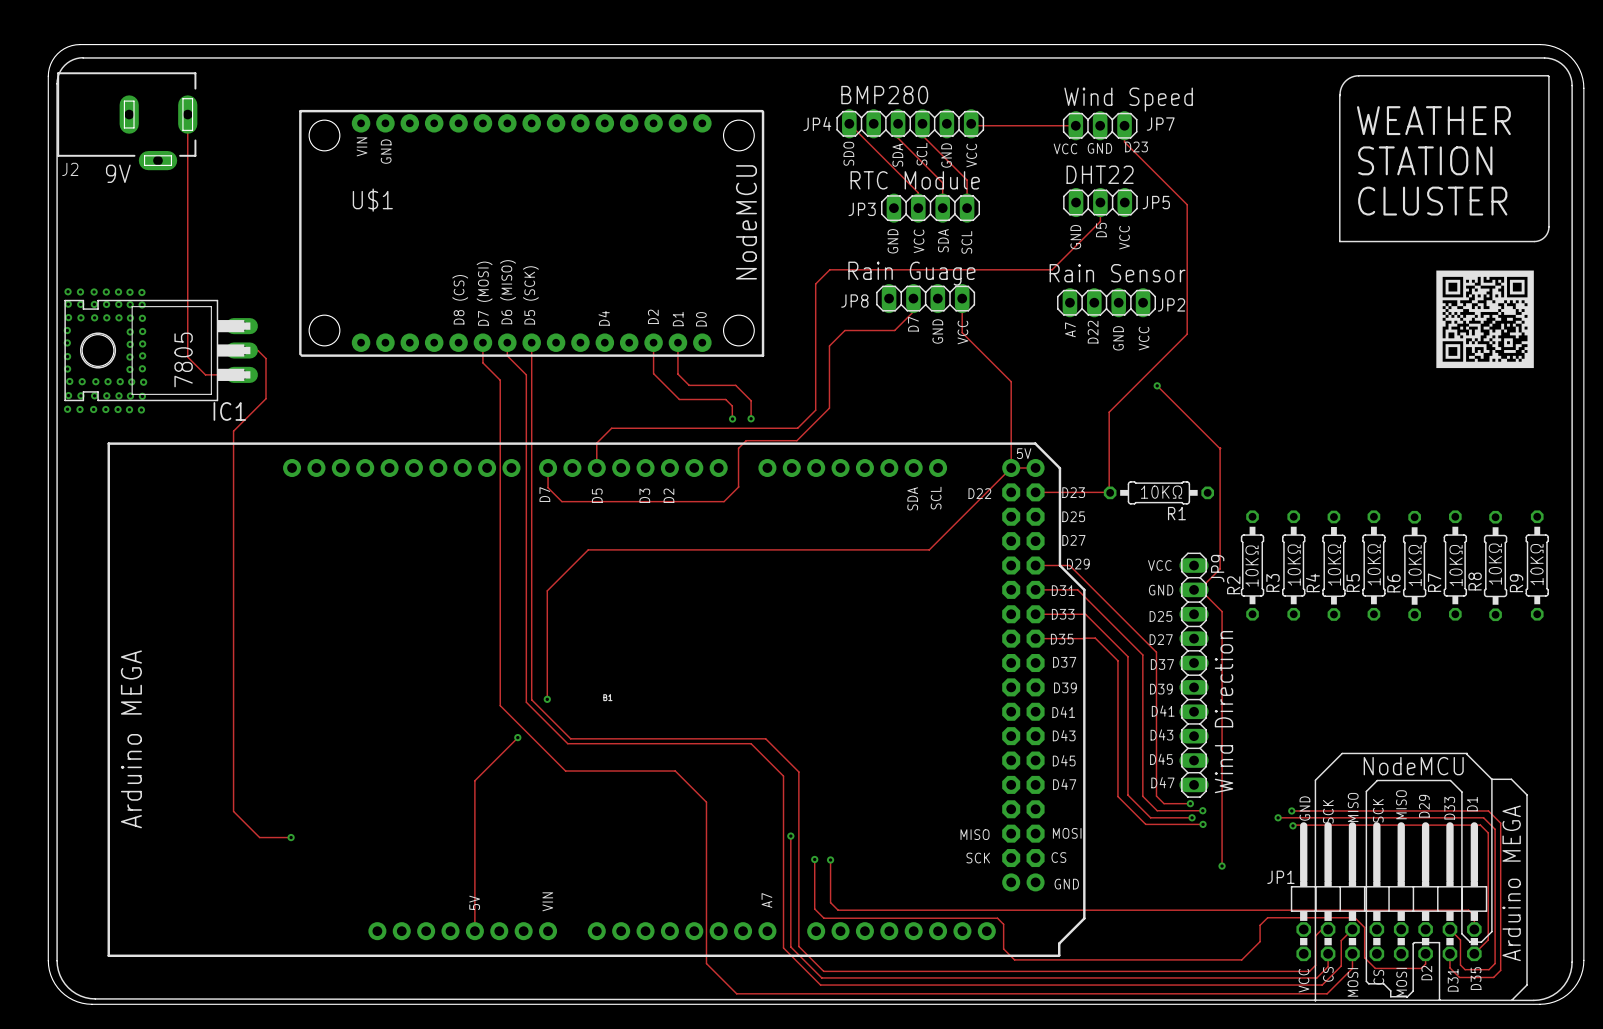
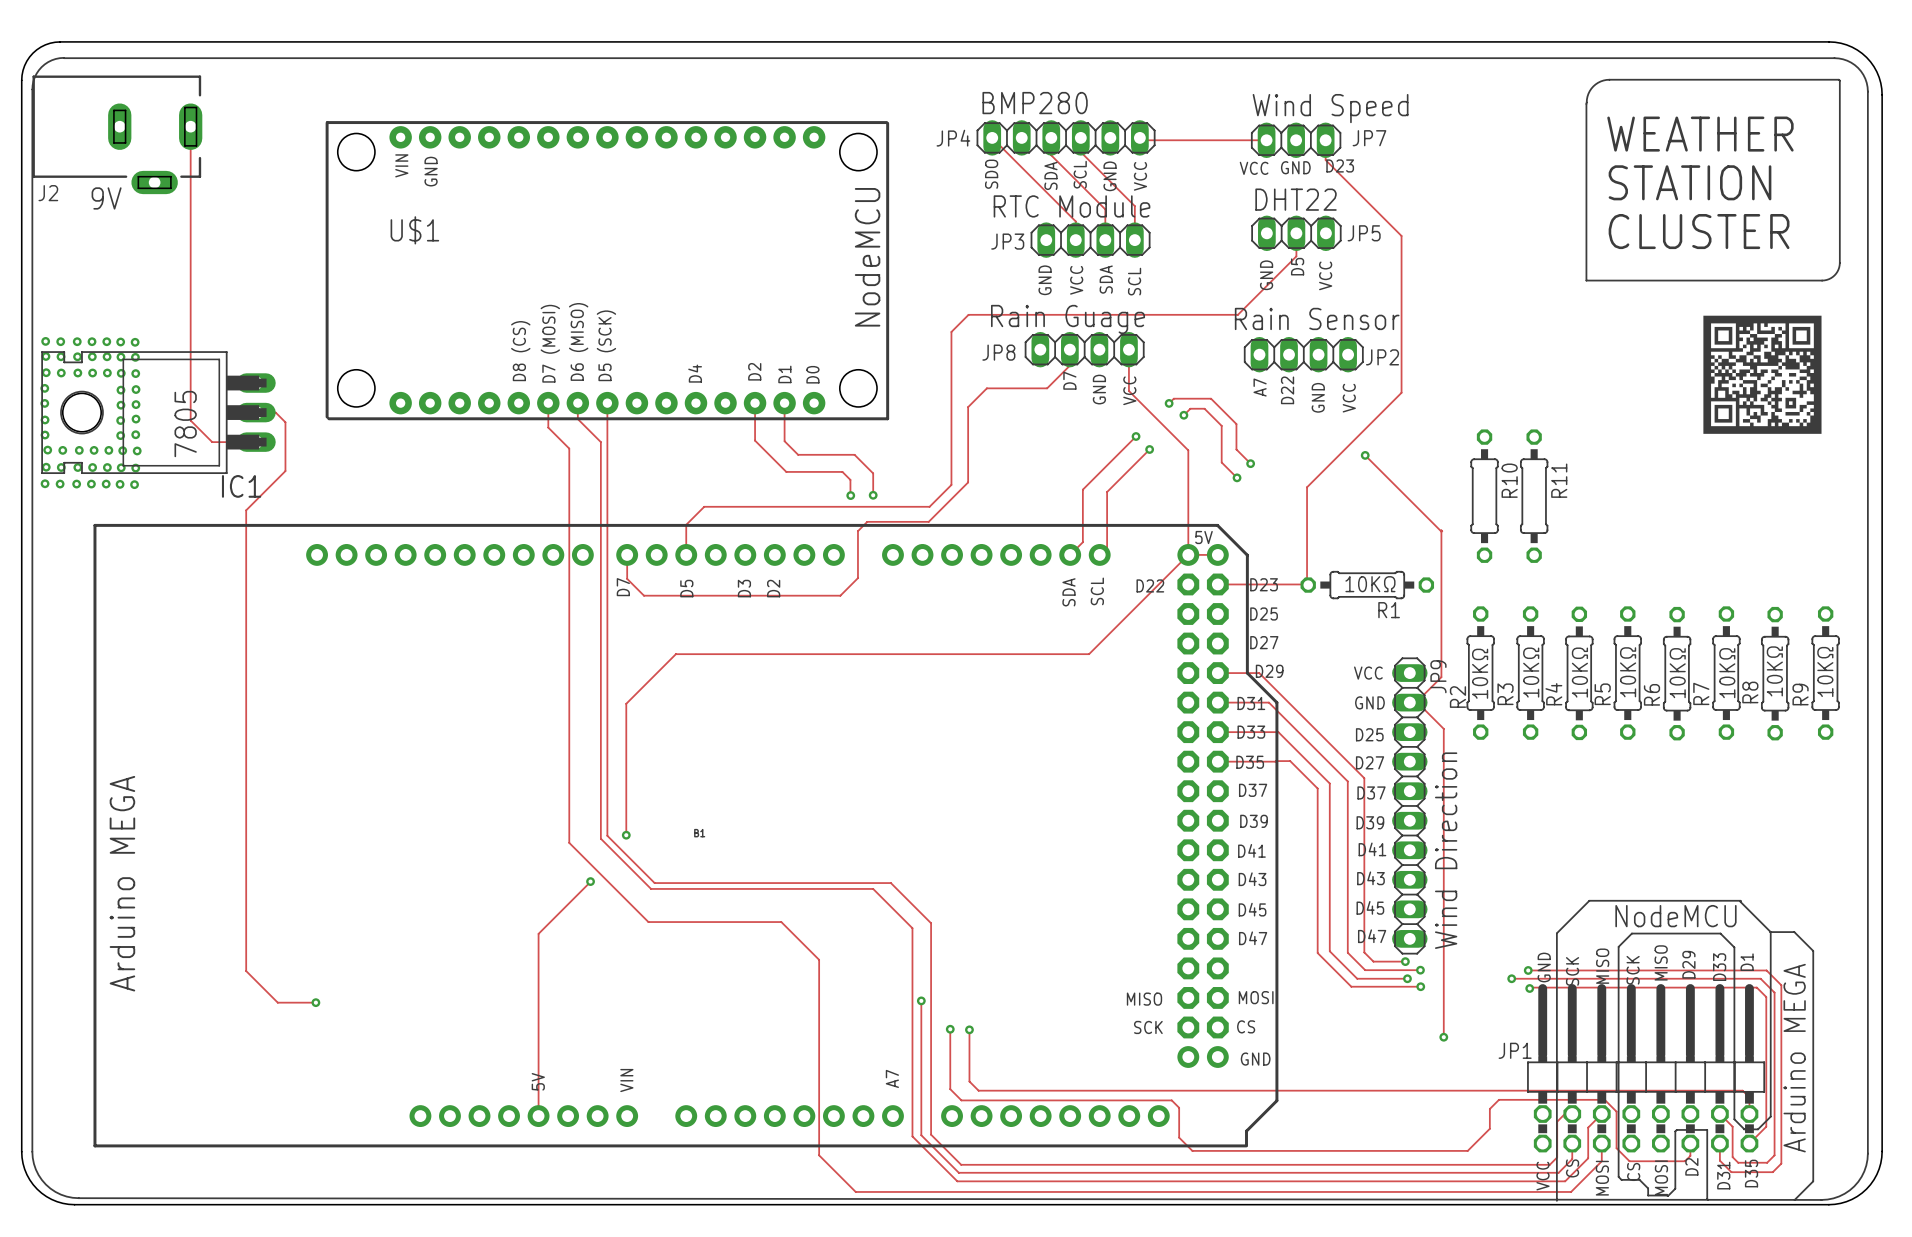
track: none -> (1169, 403) (1173, 398) (1211, 398) (1236, 424) (1236, 449) (1250, 463)
via: none -> (1169, 403)
track: none -> (1183, 415) (1190, 408) (1204, 408) (1221, 425) (1221, 462) (1237, 477)
via: none -> (1183, 415)
track: none -> (1136, 436) (1082, 489) (1082, 542) (1070, 554)
via: none -> (1136, 436)
track: none -> (1149, 449) (1107, 492) (1107, 547) (1099, 554)
via: none -> (1149, 449)
via: none -> (1250, 463)
via: none -> (1237, 477)
R10: none -> (1484, 496)
R11: none -> (1534, 496)

